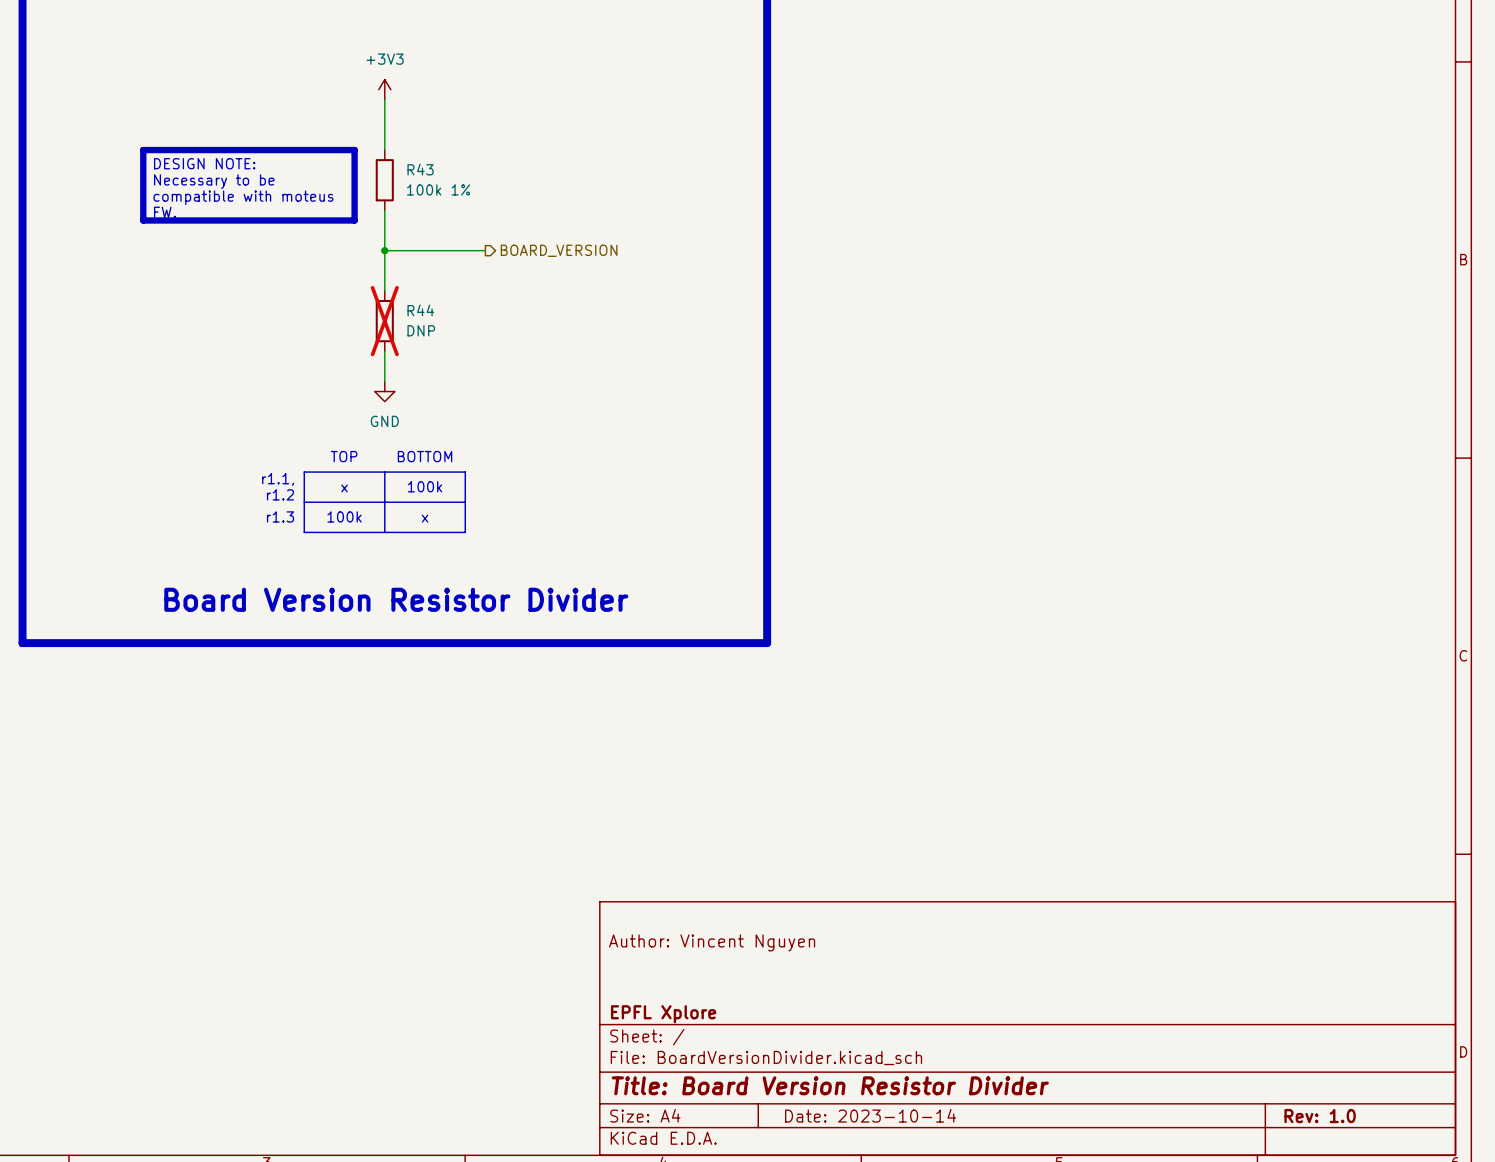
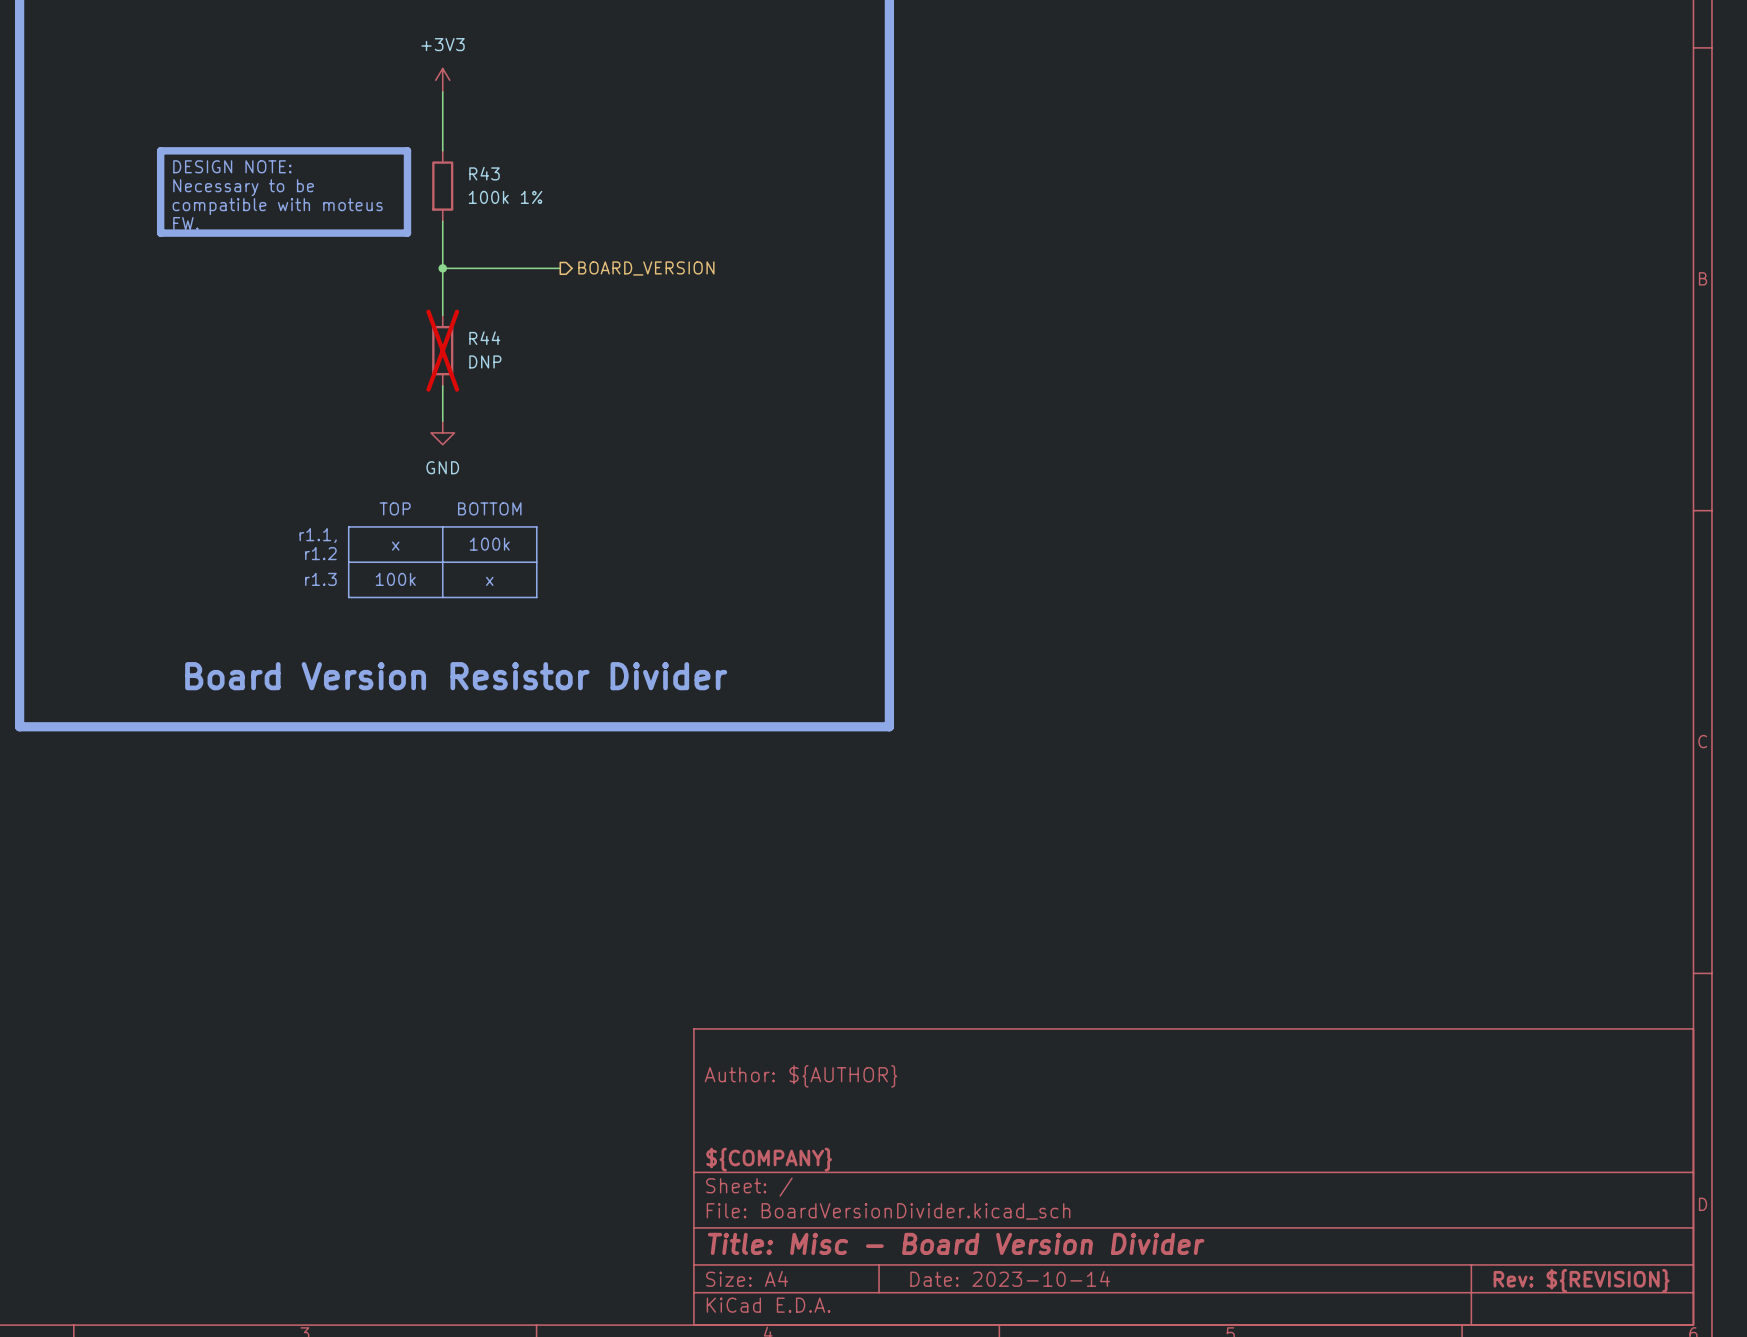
title block: Author: Vincent Nguyen (712, 942) -> Author: ${AUTHOR} (800, 1076)
title block: EPFL Xplore (663, 1014) -> ${COMPANY} (769, 1159)
title block: Title: Board Version Resistor Divider (830, 1085) -> Title: Misc - Board Version Divider (956, 1243)
title block: Rev: 1.0 (1320, 1116) -> Rev: ${REVISION} (1581, 1280)

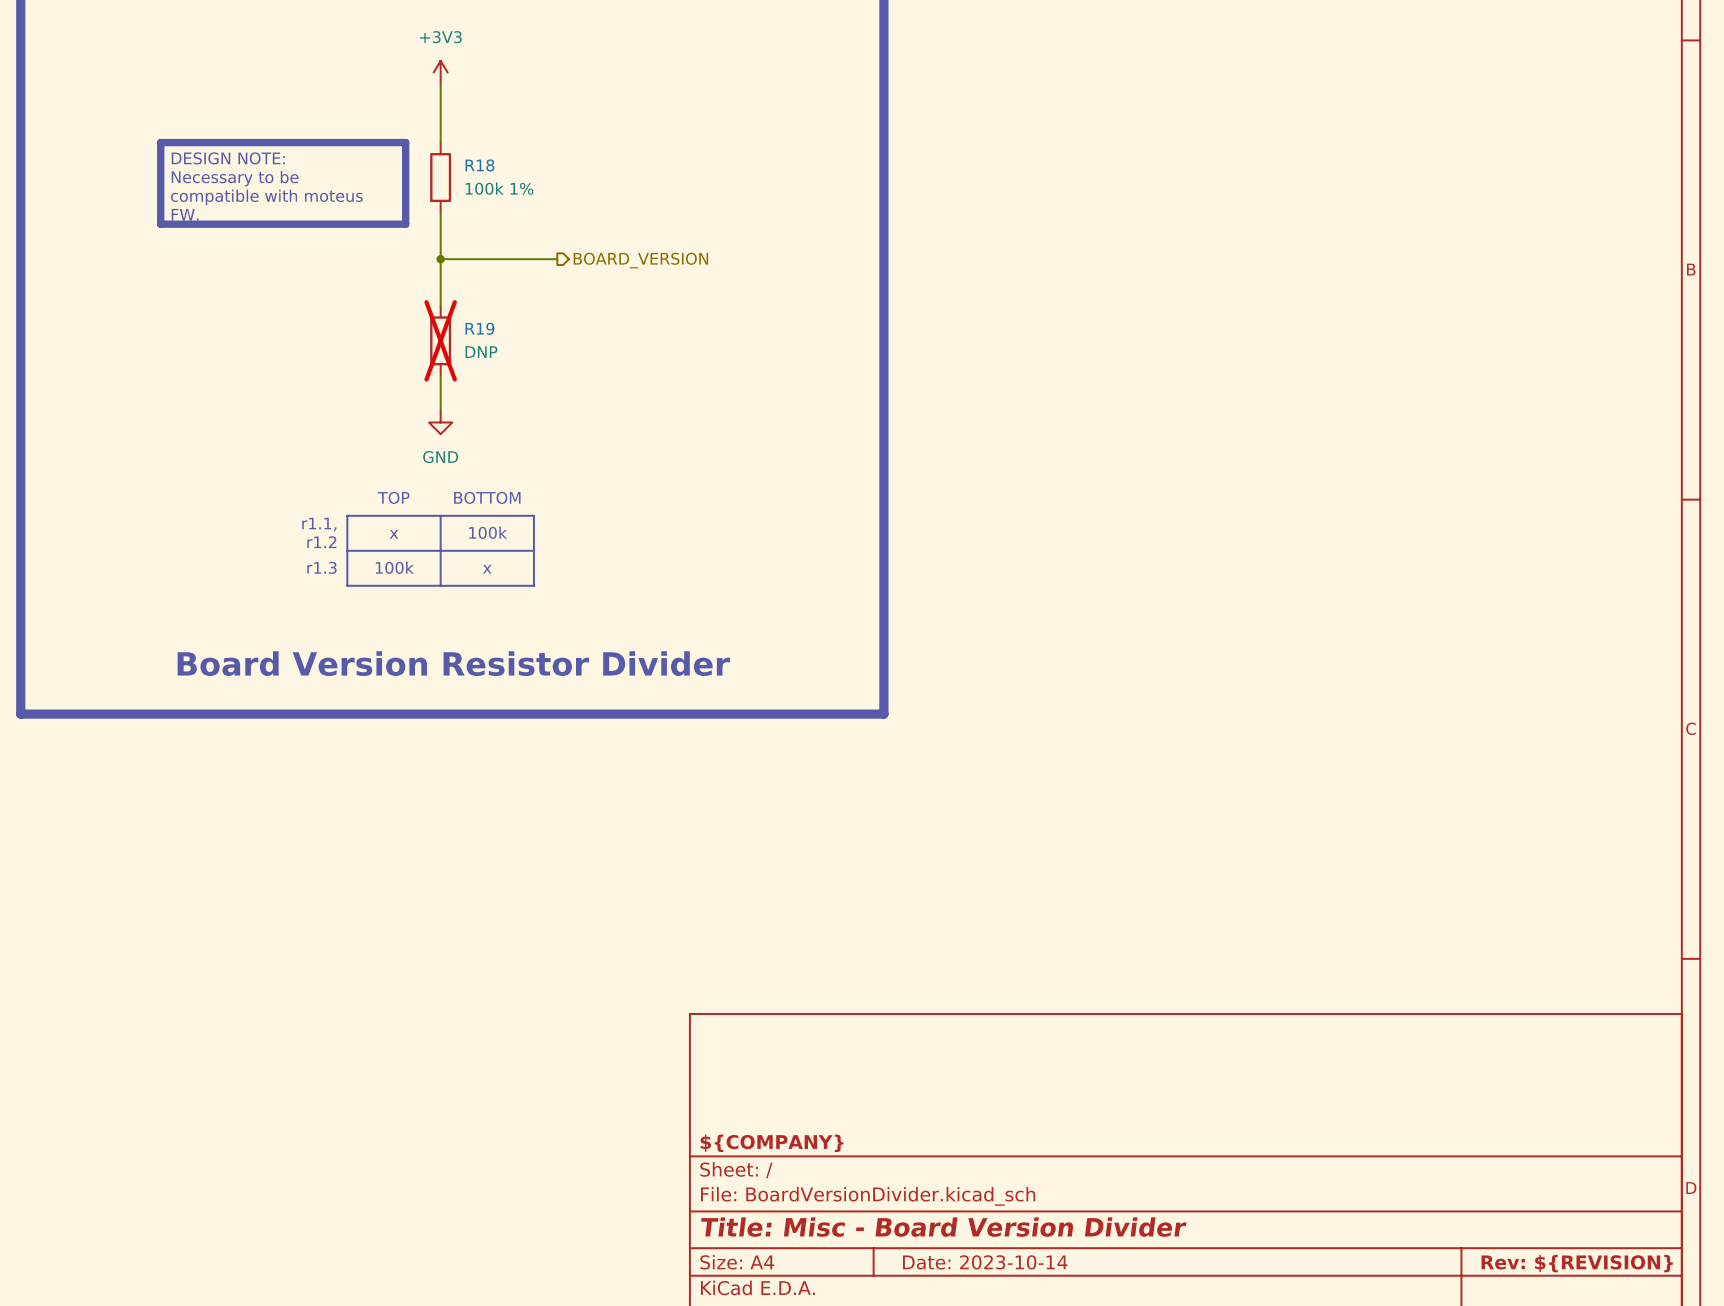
R43 name: R43 (484, 173) -> R18 (479, 165)
R44 name: R44 (484, 338) -> R19 (479, 328)
title block: Author: ${AUTHOR} (800, 1076) -> none

